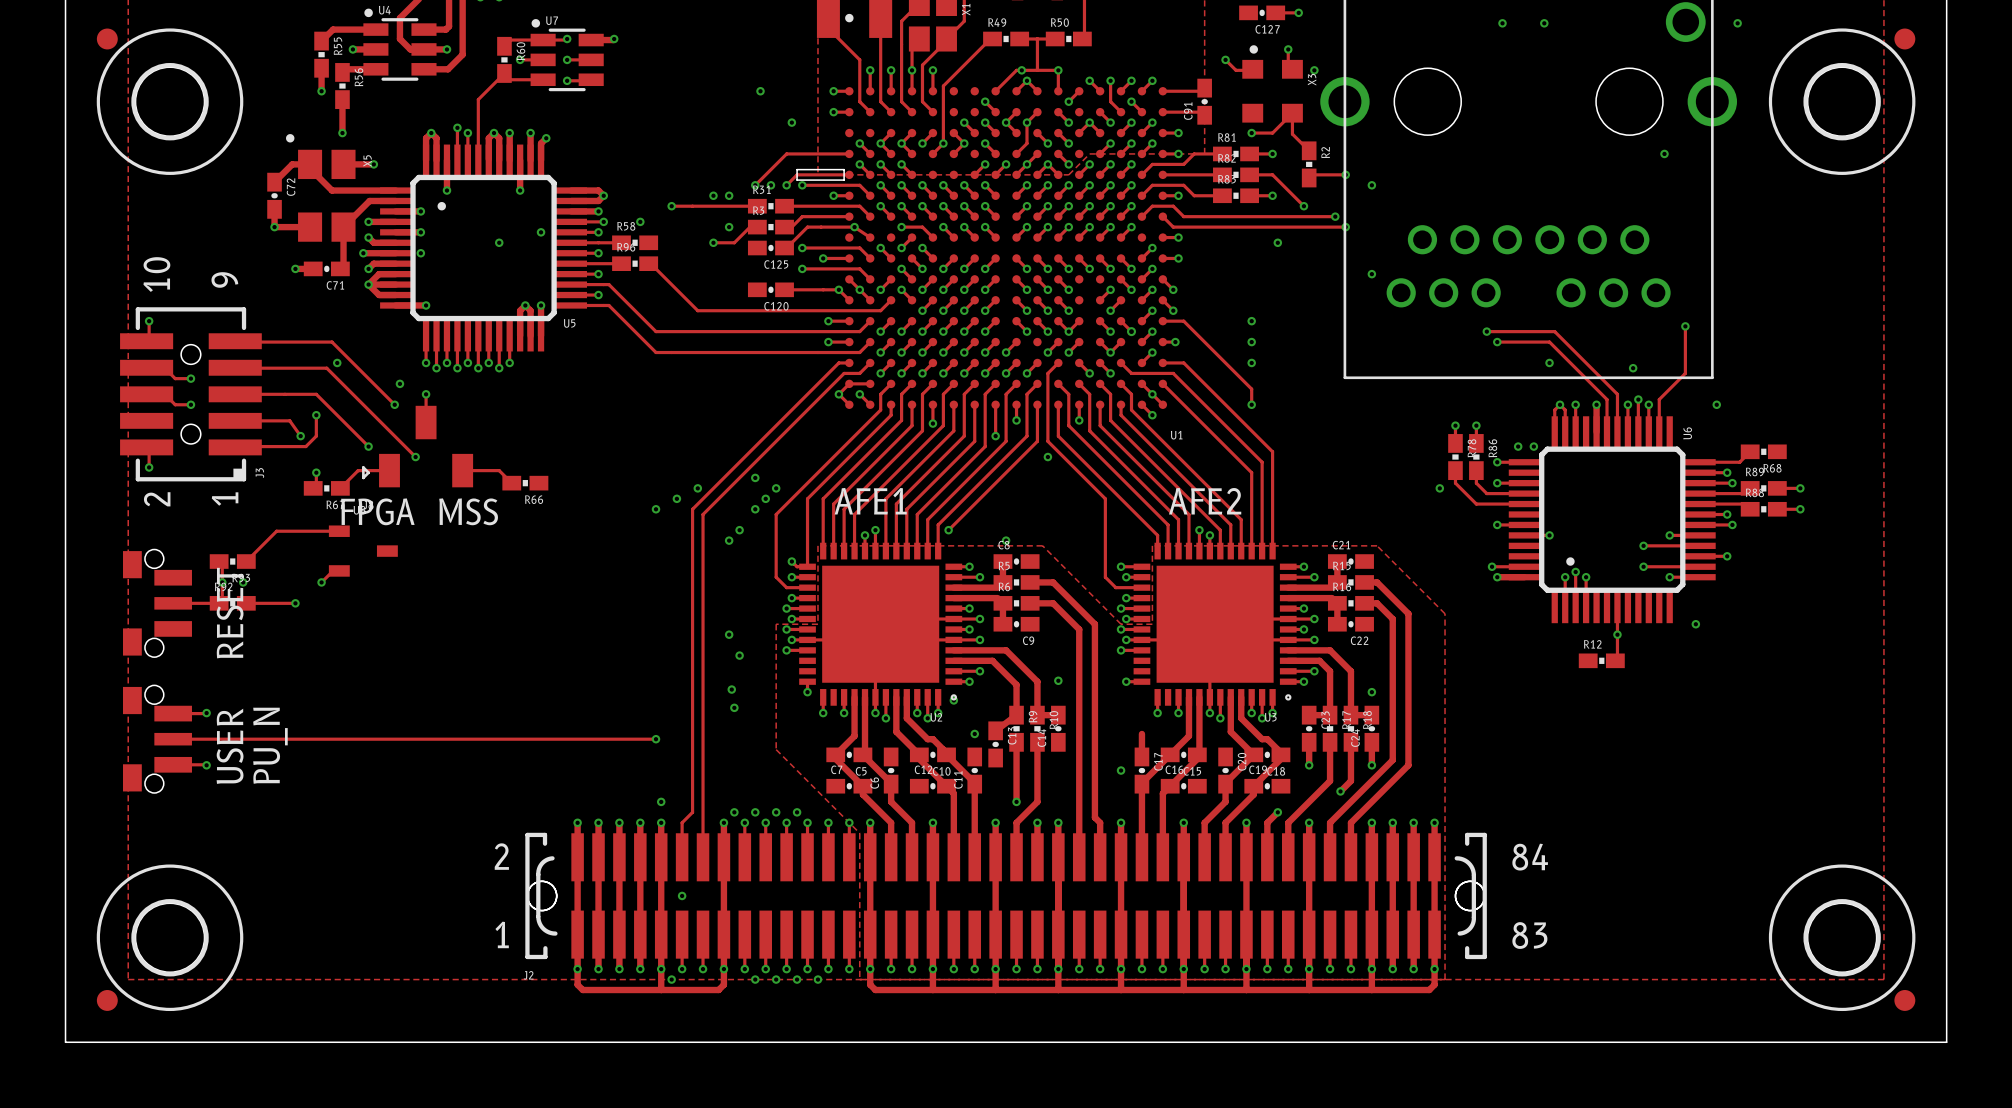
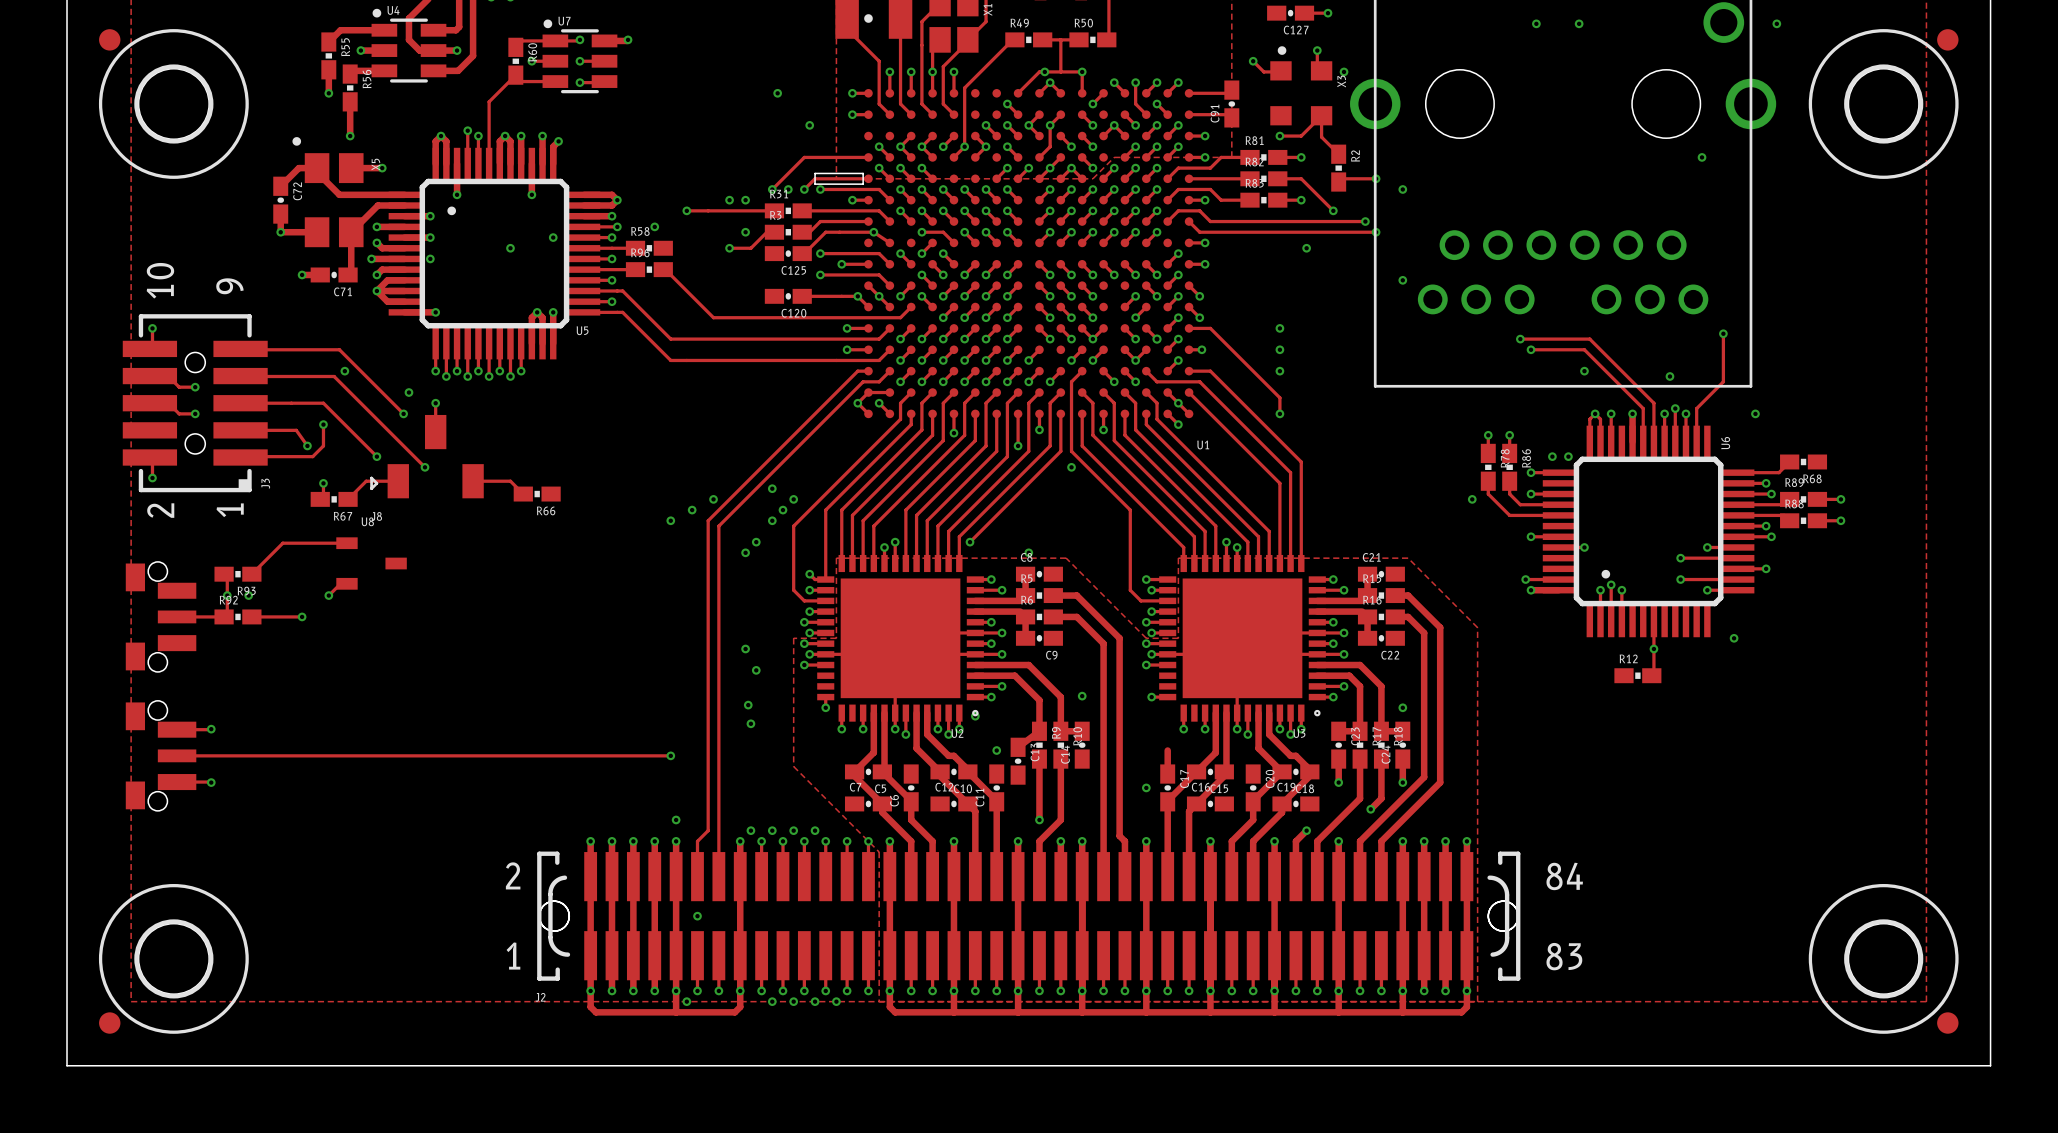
text: AFE1 (870, 501) -> none
text: AFE2 (1205, 501) -> none
text: FPGA (377, 511) -> none
text: MSS (468, 511) -> none
text: RESET (230, 613) -> none
text: PU_N (270, 745) -> none
text: USER (230, 746) -> none

